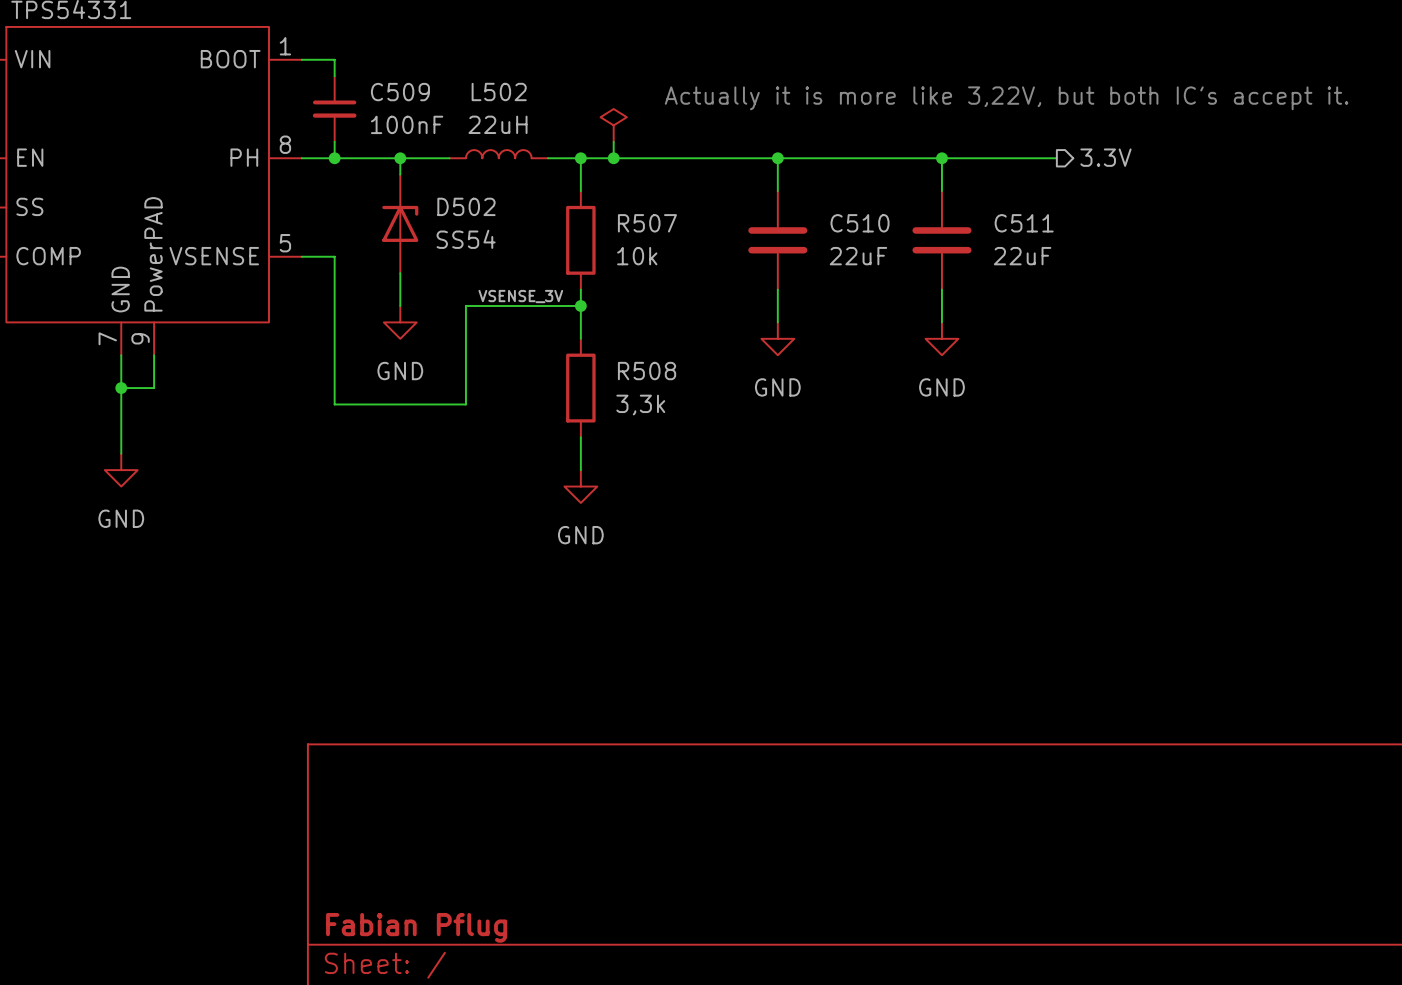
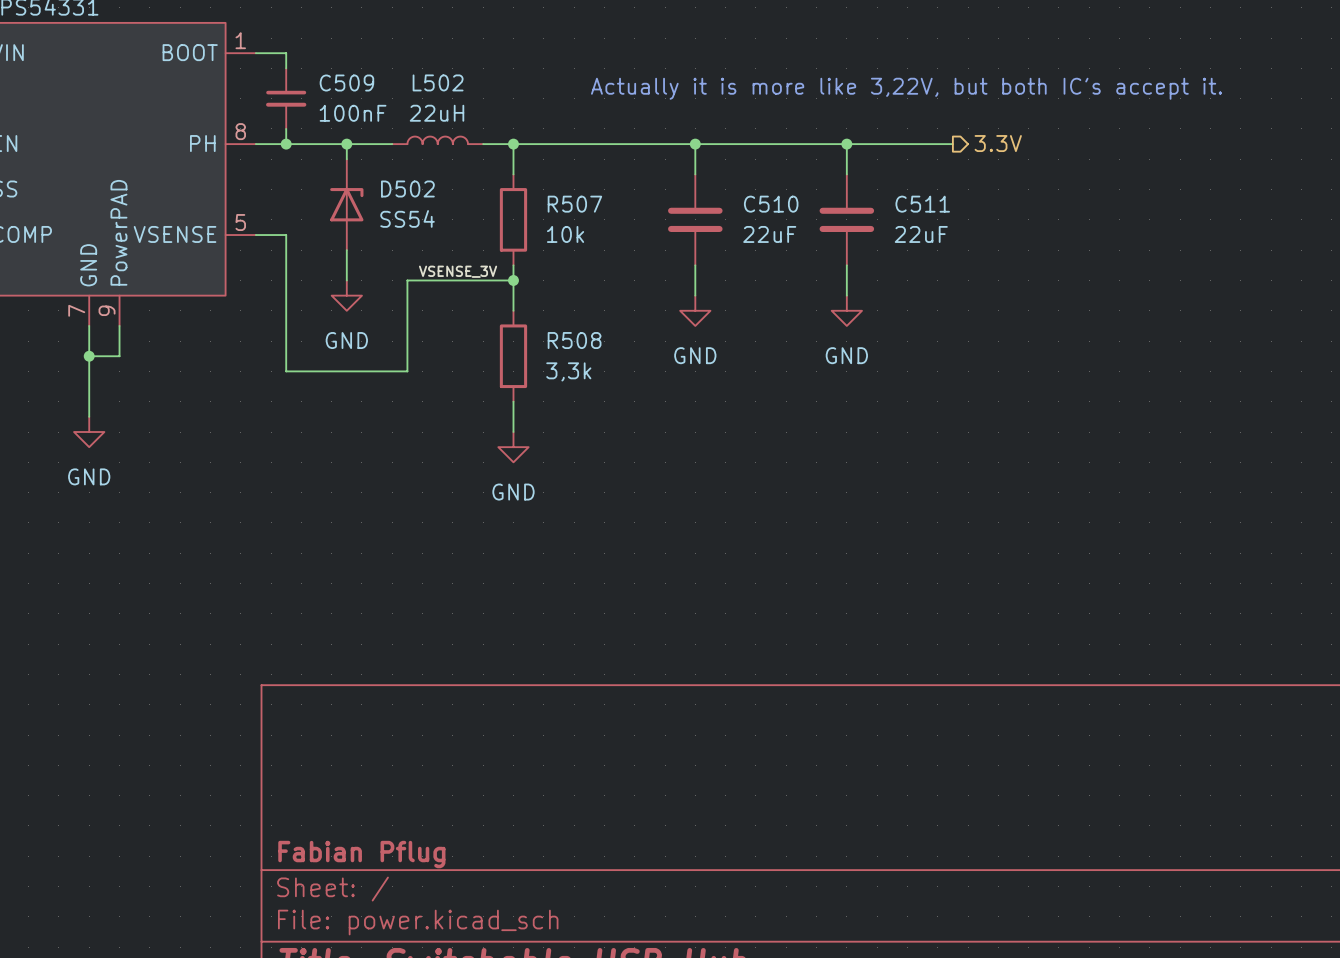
power symbol: (613, 125) -> none
wire: (613, 141) (613, 158) -> none
junction: (613, 158) -> none

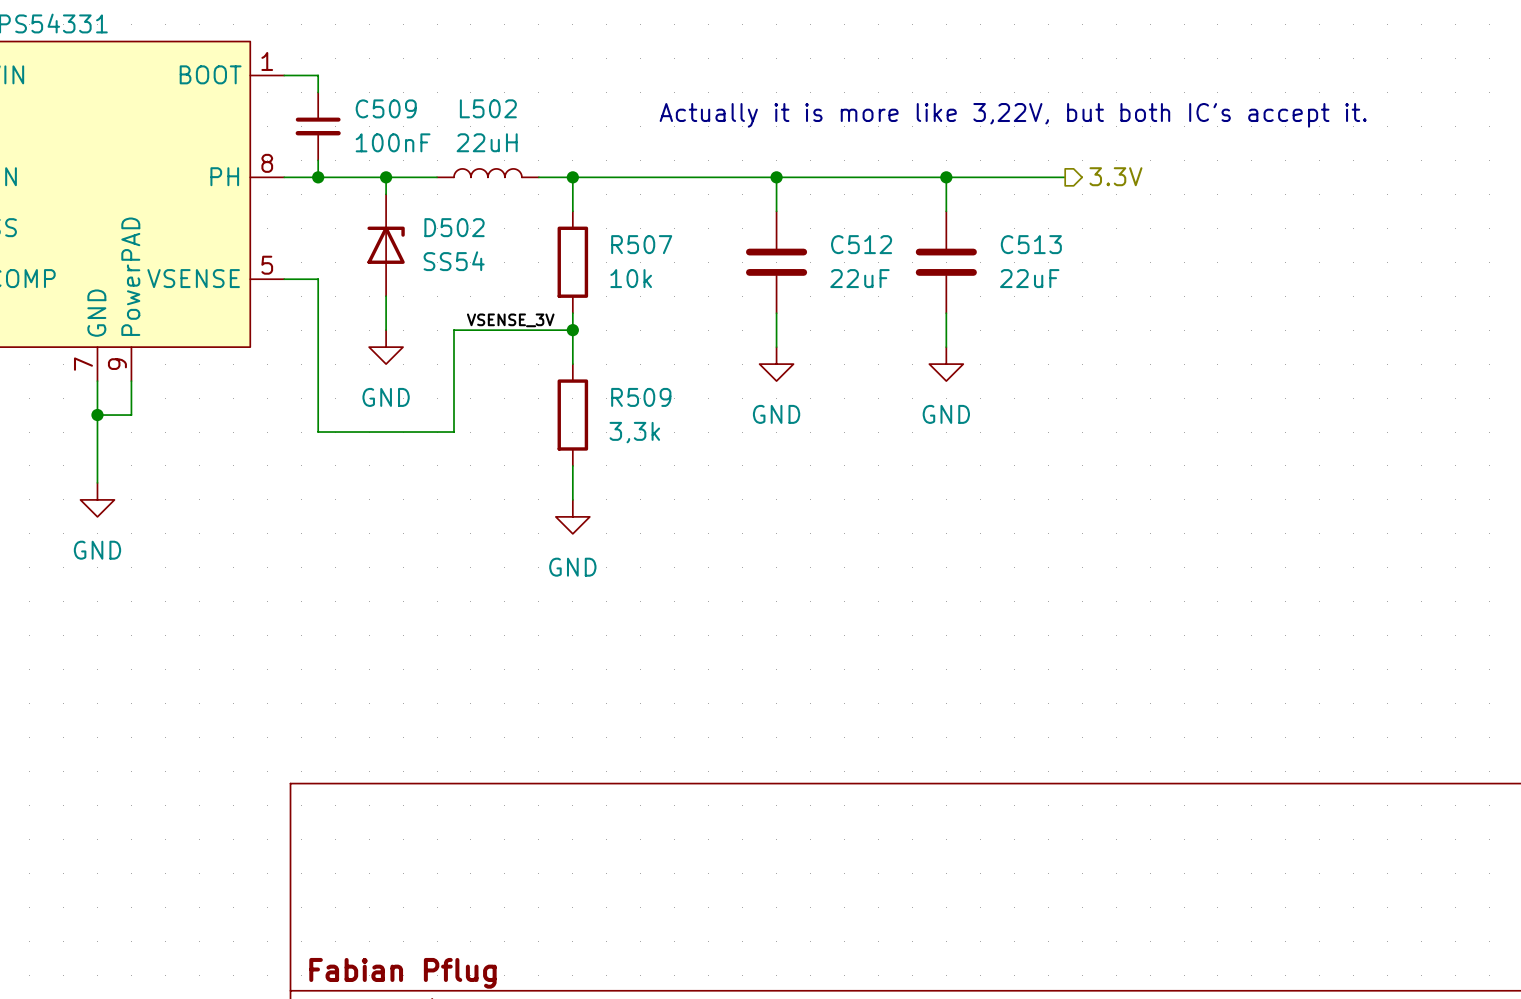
C510 name: C510 (771, 204) -> C512 (861, 244)
C511 name: C511 (922, 204) -> C513 (1031, 244)
R508 name: R508 (574, 340) -> R509 (641, 397)

